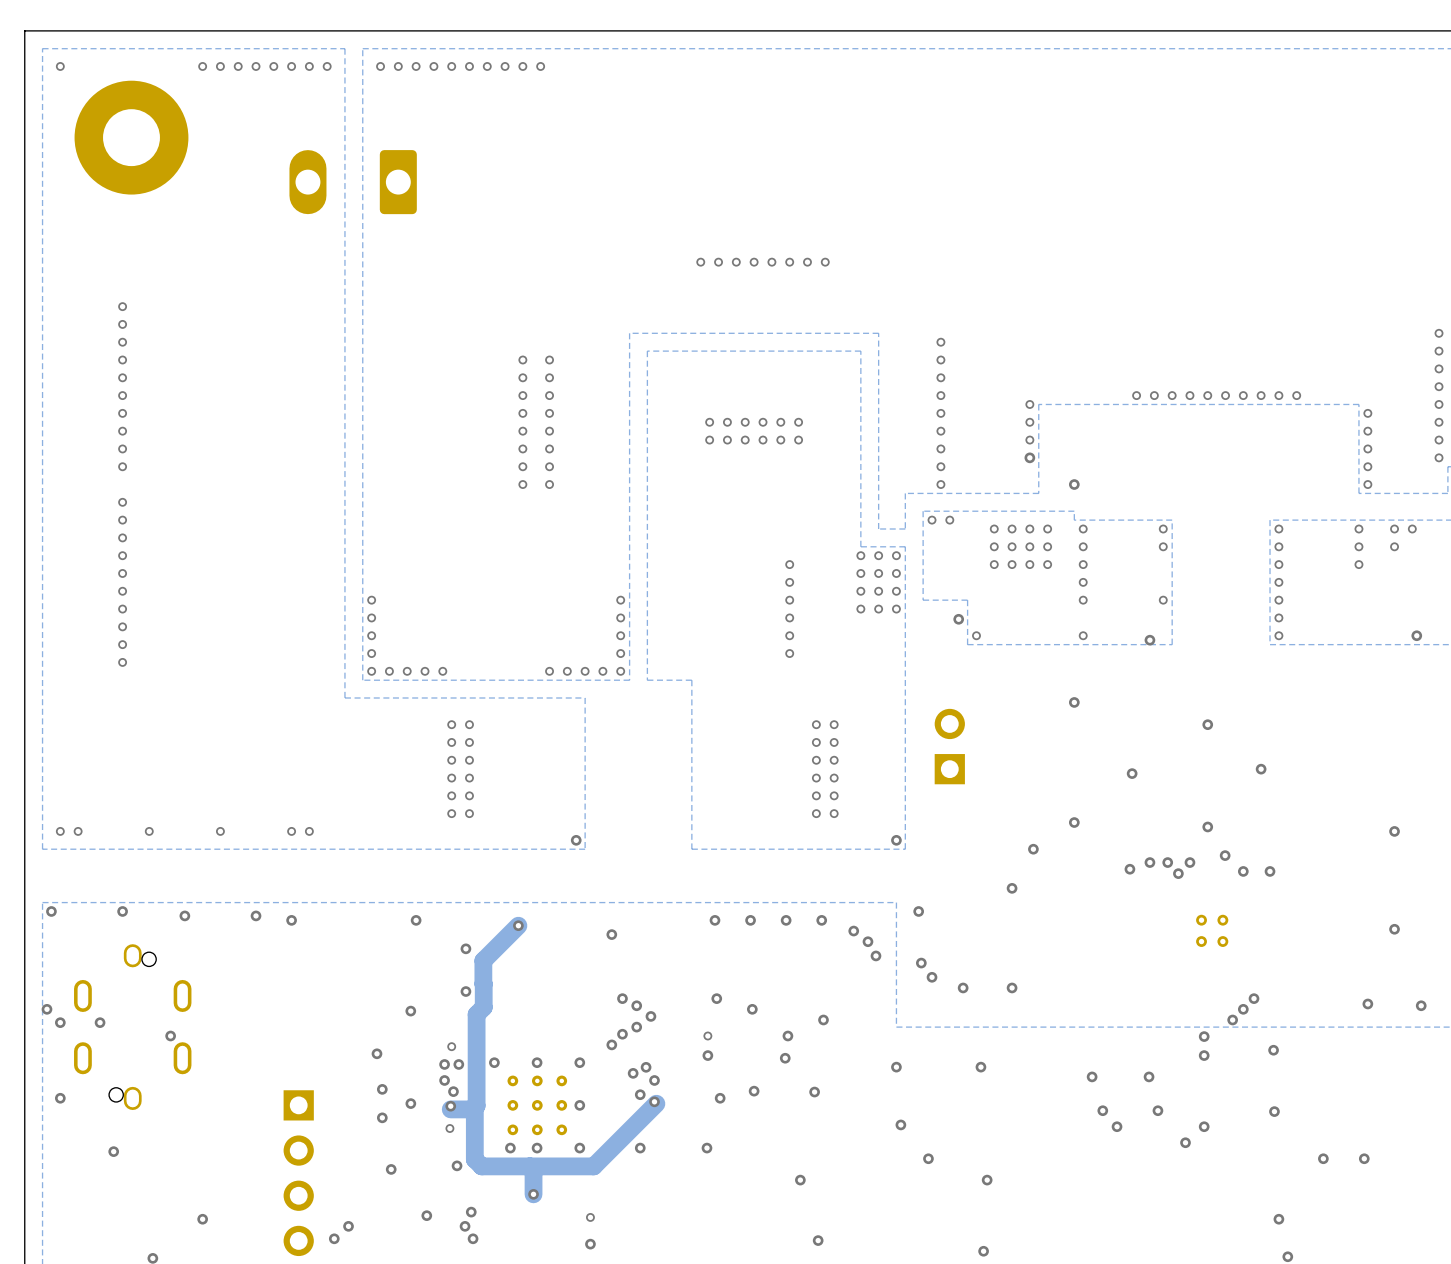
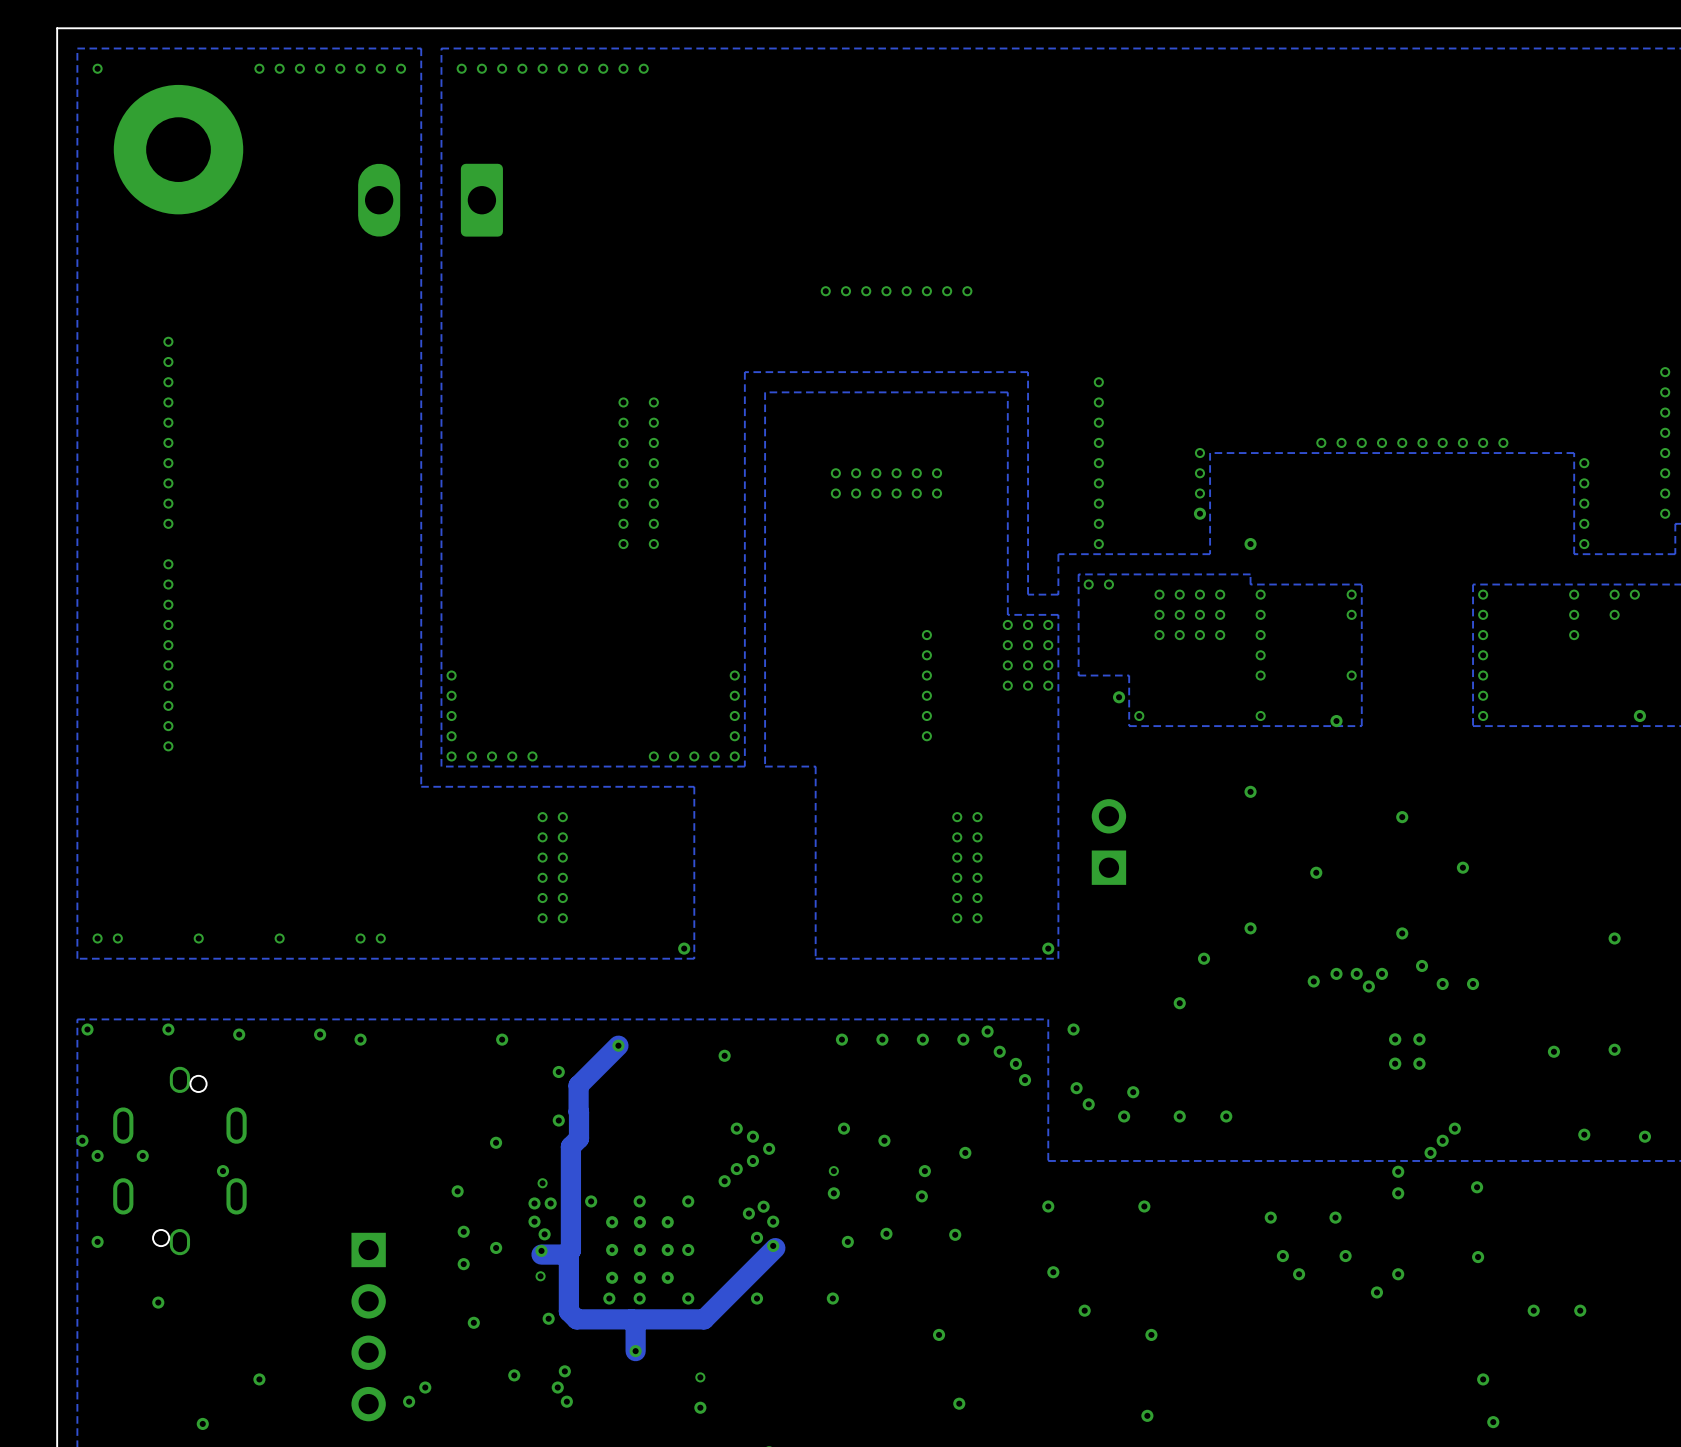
via: none -> (987, 1031)
via: none -> (1553, 1051)
via: none -> (1133, 1092)
via: none -> (1226, 1116)

